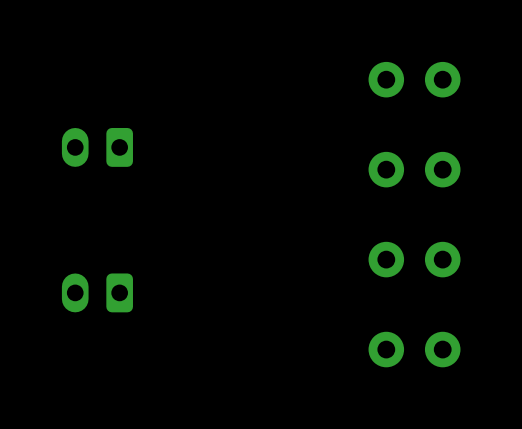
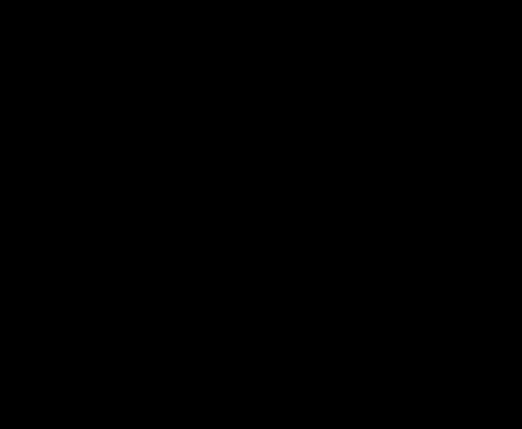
part: (414, 79) -> none
part: (97, 147) -> none
part: (414, 169) -> none
part: (414, 259) -> none
part: (97, 292) -> none
part: (414, 349) -> none

